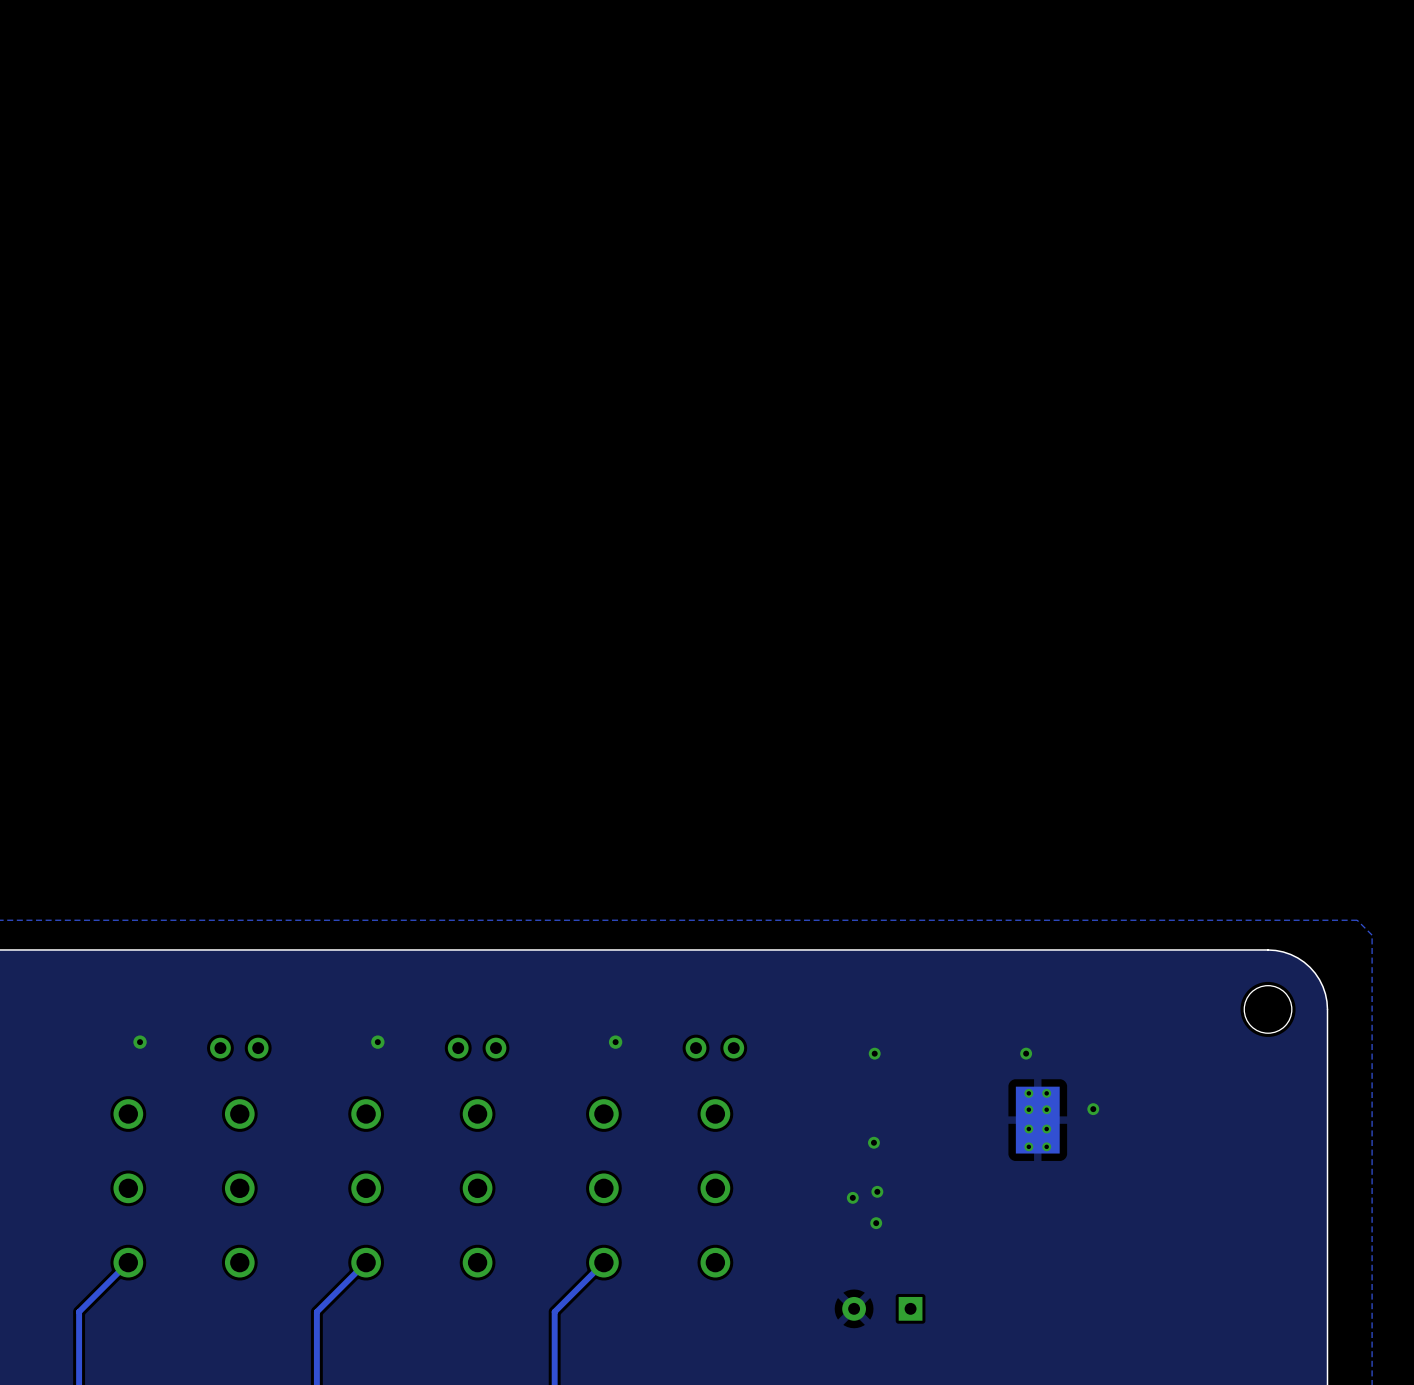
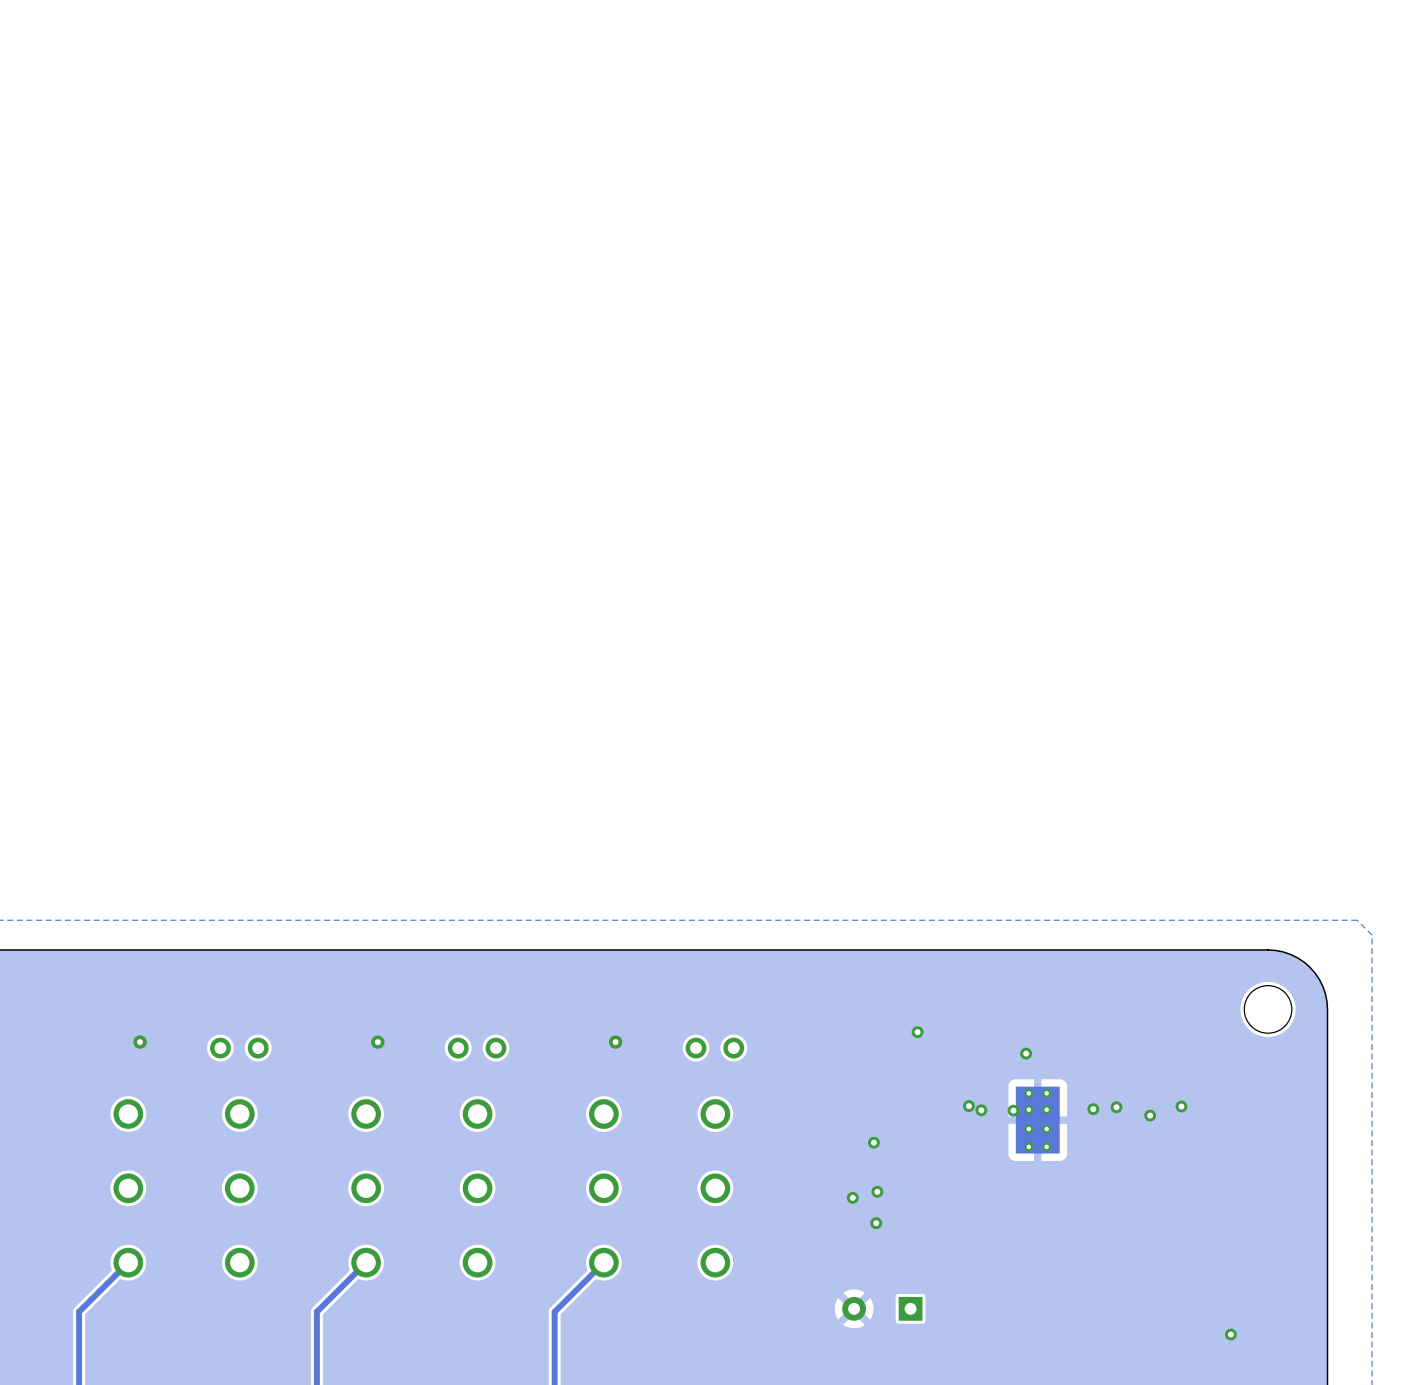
via position: (874, 1053) -> (917, 1032)
via: none -> (968, 1106)
via: none -> (1181, 1106)
via: none -> (1116, 1107)
via: none -> (981, 1110)
via: none -> (1013, 1110)
via: none -> (1150, 1115)
via: none -> (1230, 1334)

